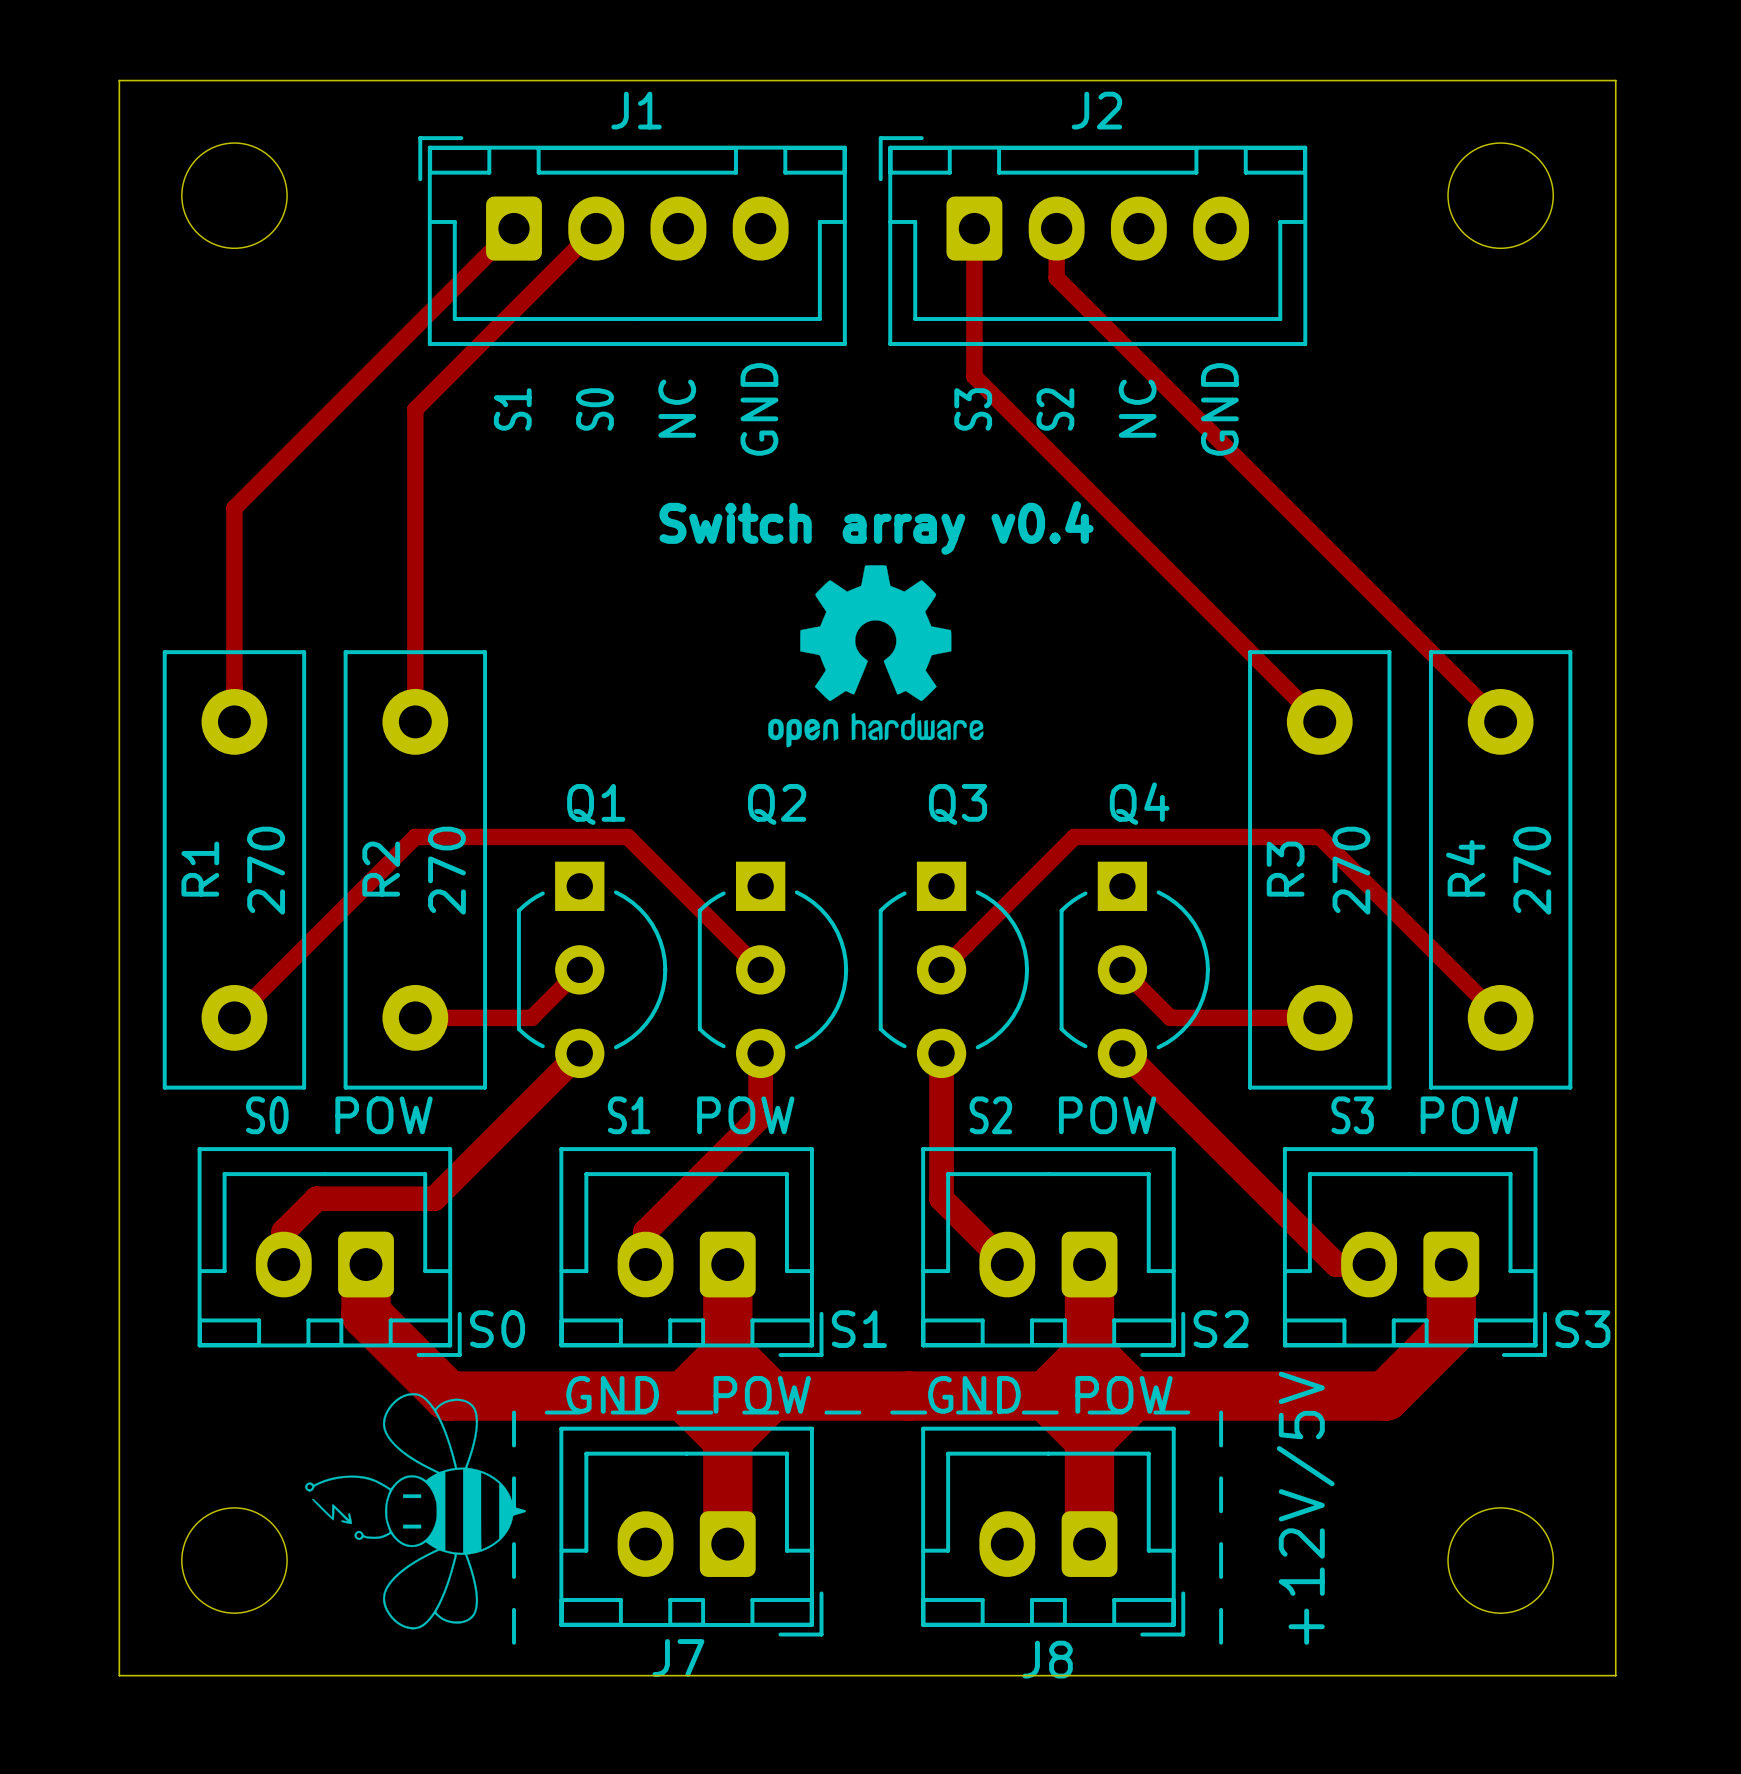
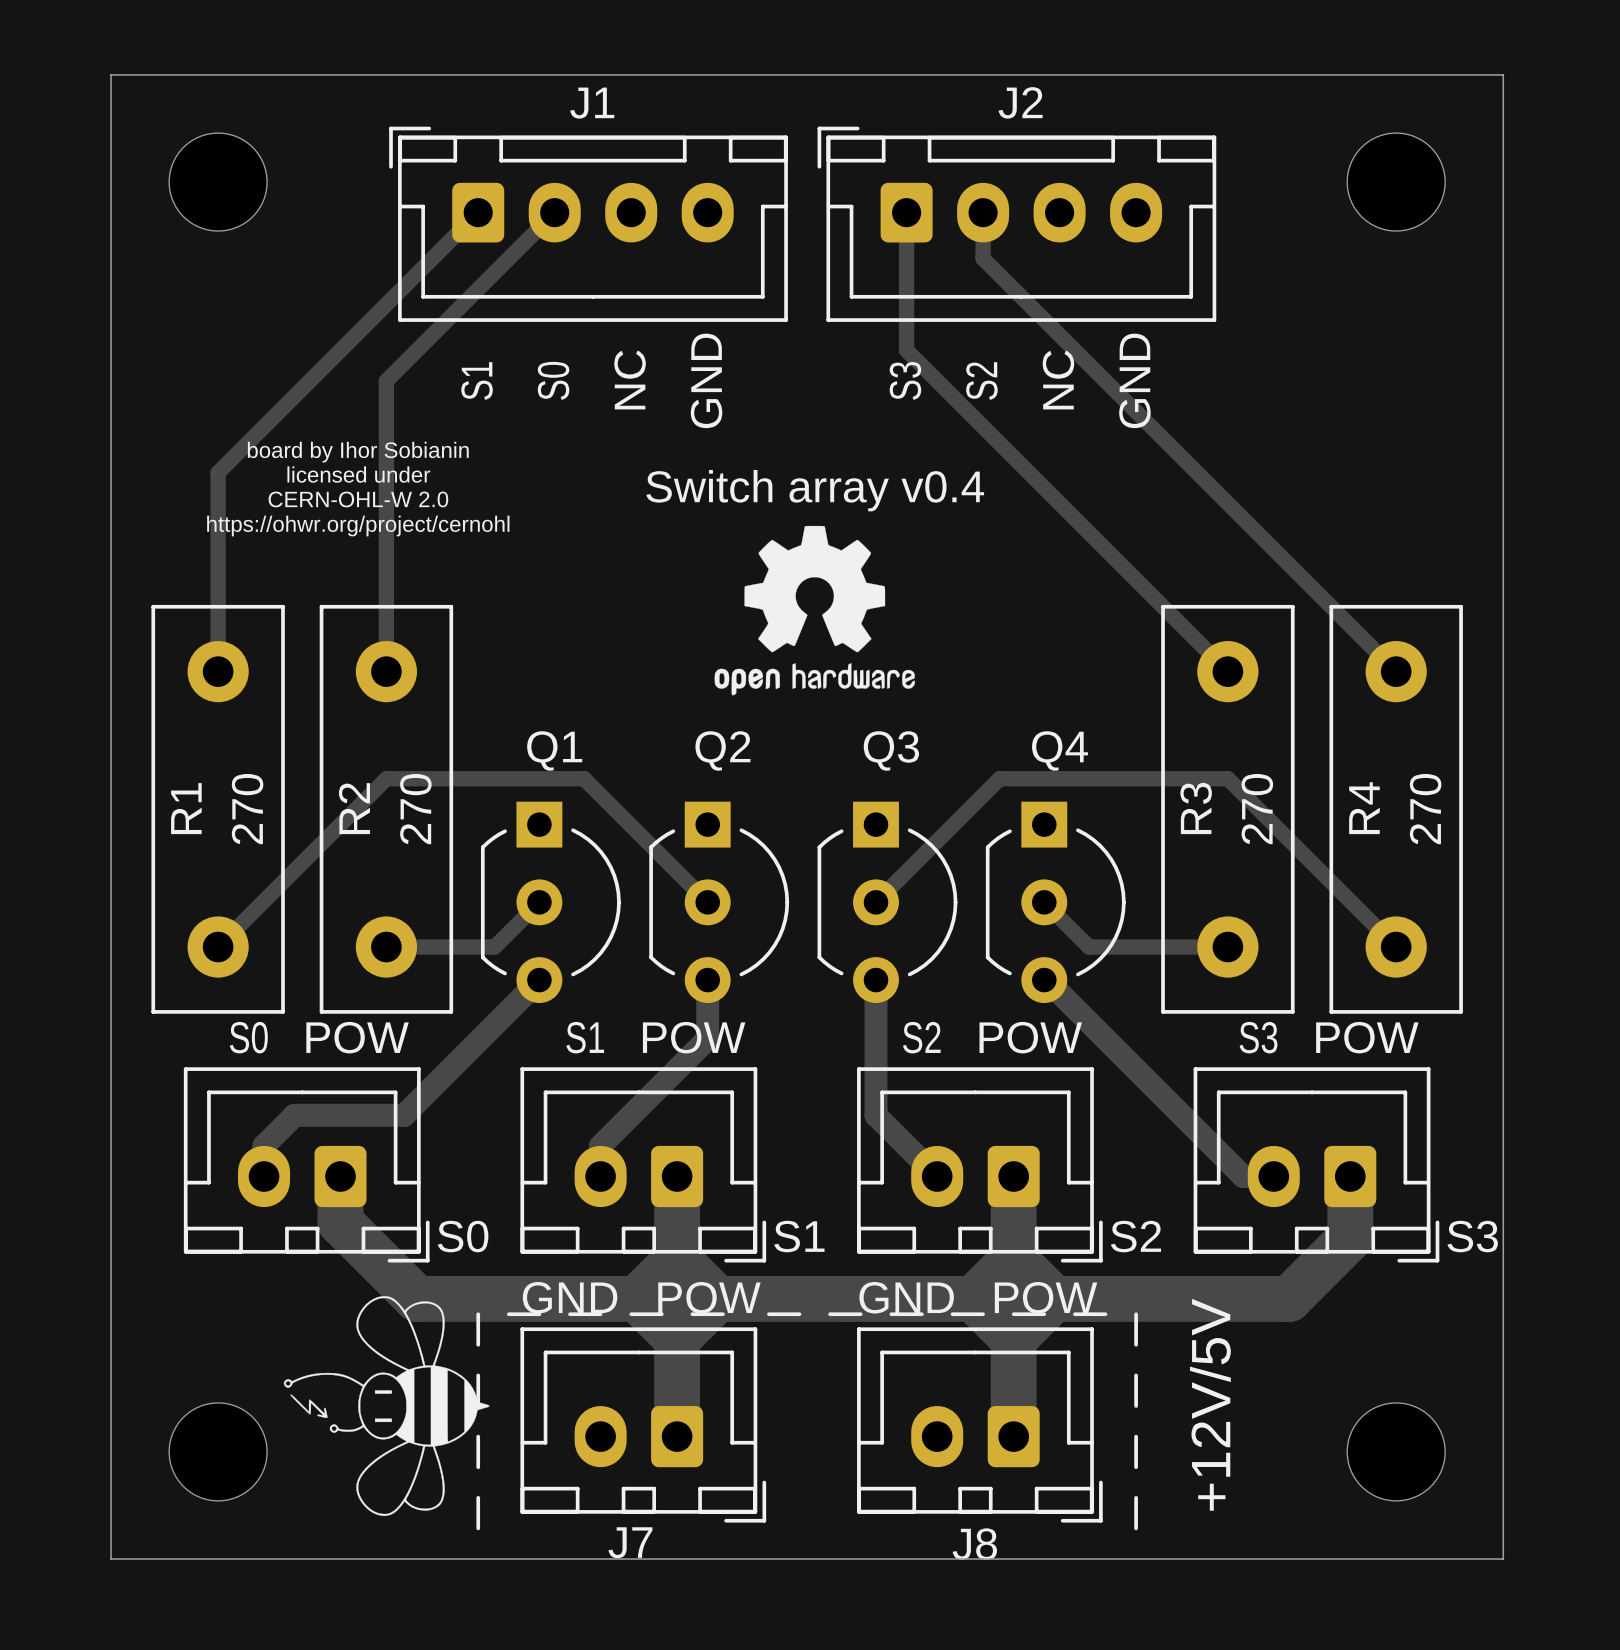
text: none -> board by Ihor Sobianin (358, 452)
text: none -> licensed under (358, 474)
text: none -> CERN-OHL-W 2.0 (358, 499)
text: none -> https://ohwr.org/project/cernohl (358, 526)

